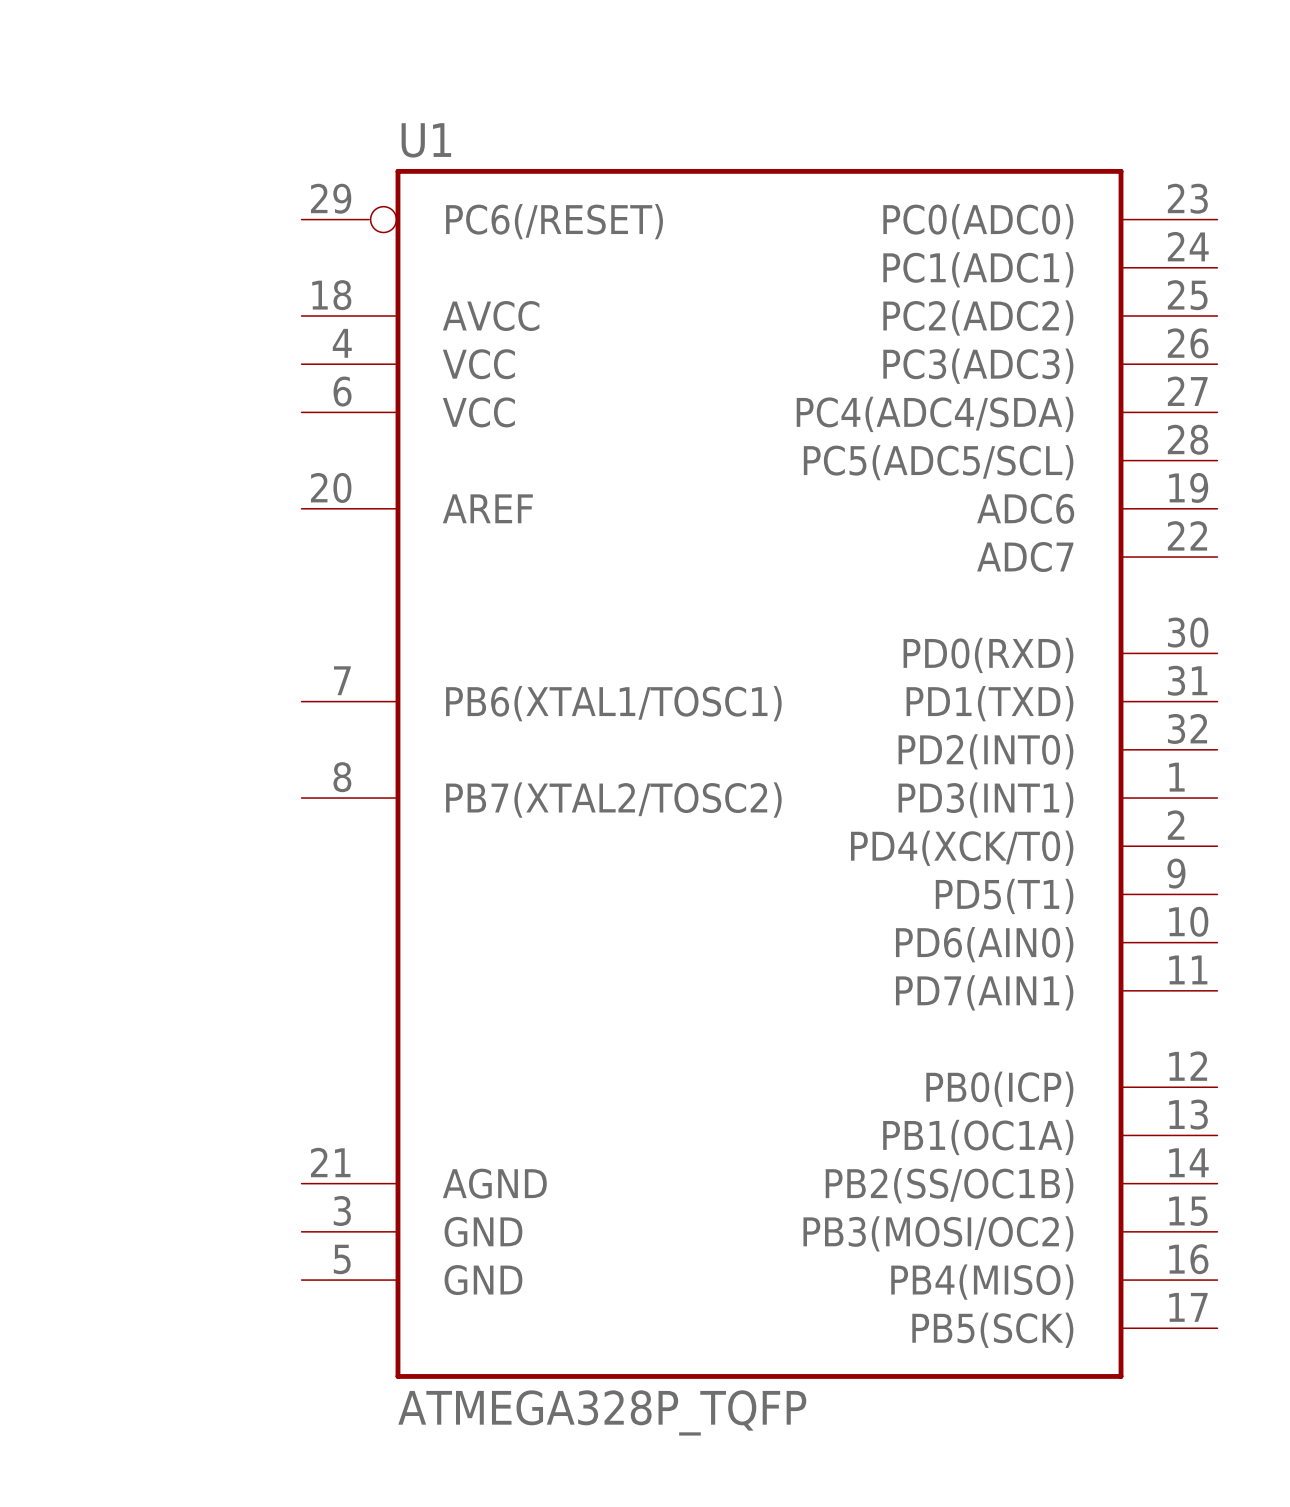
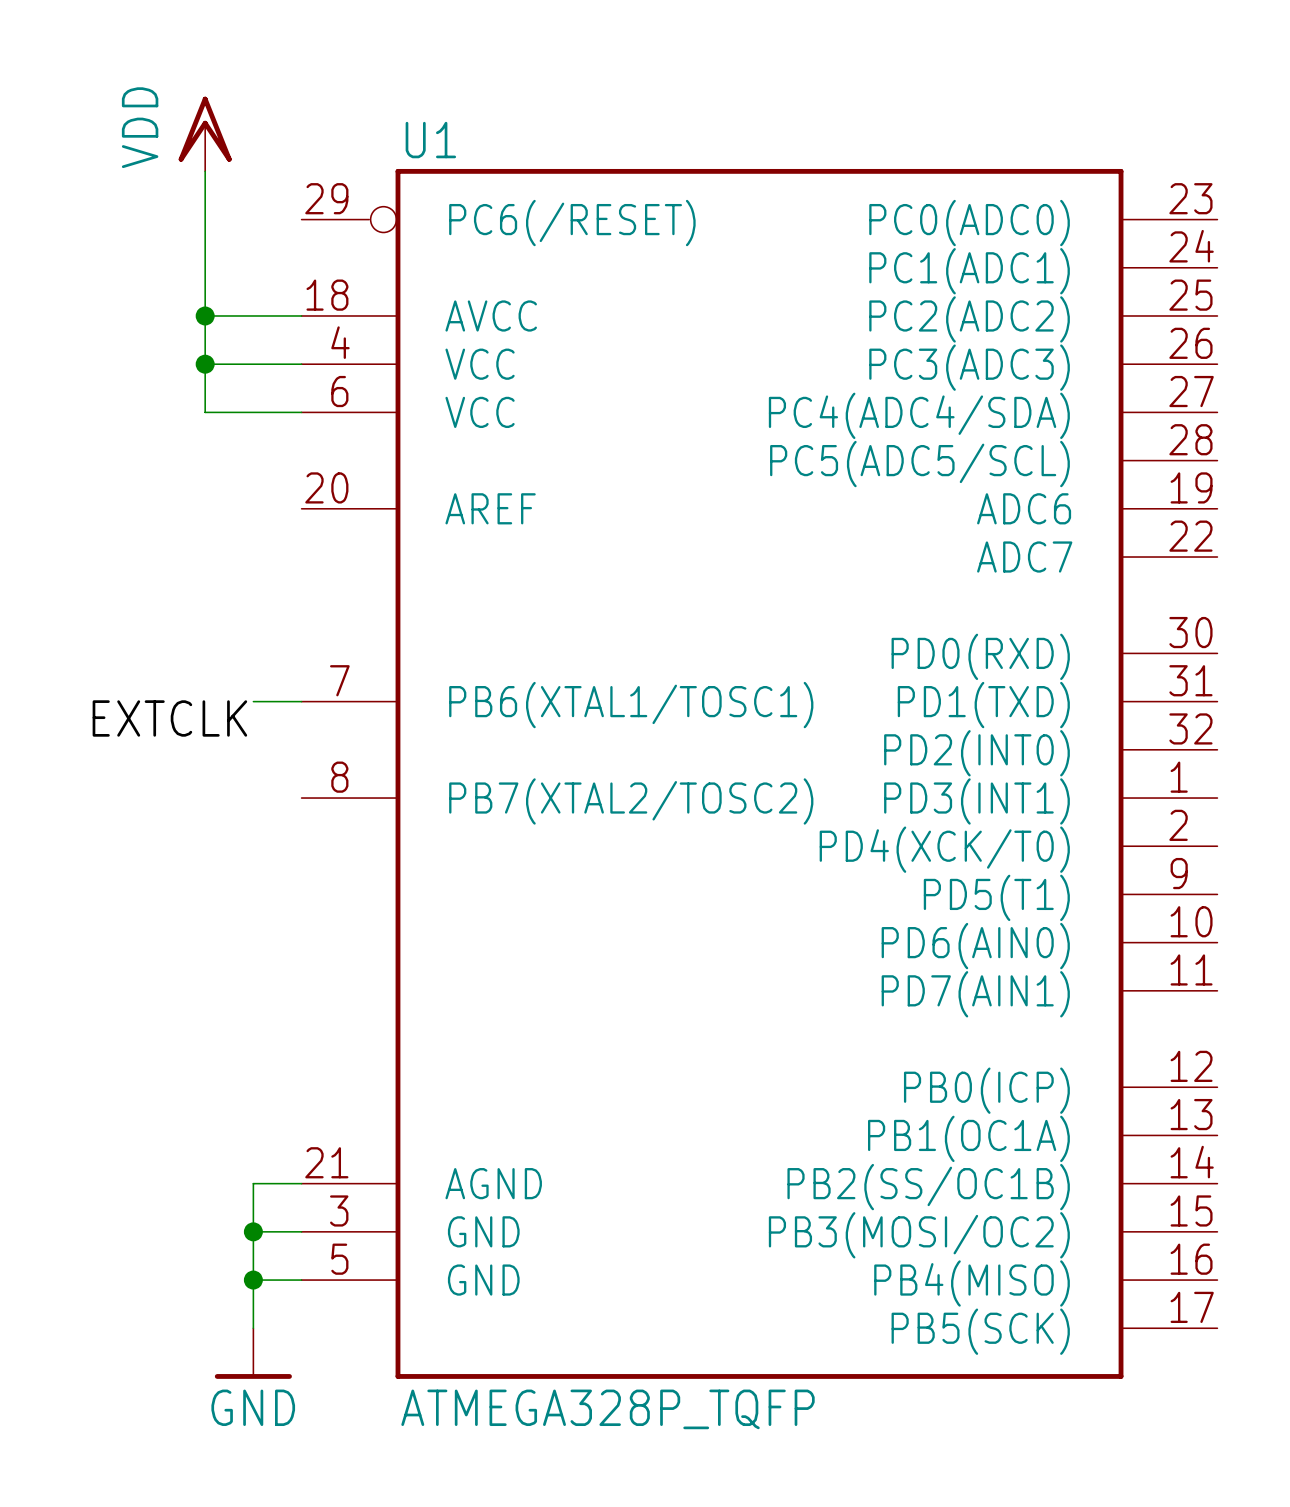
power symbol: none -> VDD (205, 134)
wire: none -> (205, 171) (205, 412) (301, 412)
wire: none -> (205, 315) (301, 315)
junction: none -> (205, 315)
wire: none -> (205, 364) (301, 364)
junction: none -> (205, 364)
wire: none -> (253, 701) (301, 701)
label: none -> EXTCLK (169, 718)
wire: none -> (301, 1183) (253, 1183) (253, 1328)
wire: none -> (253, 1231) (301, 1231)
junction: none -> (253, 1231)
wire: none -> (253, 1280) (301, 1280)
junction: none -> (253, 1280)
power symbol: none -> GND (253, 1353)

